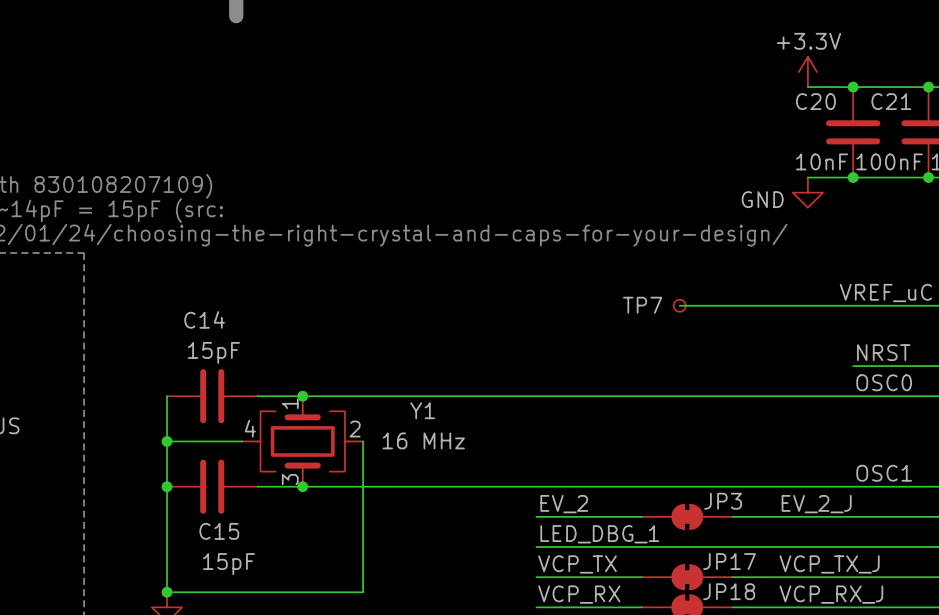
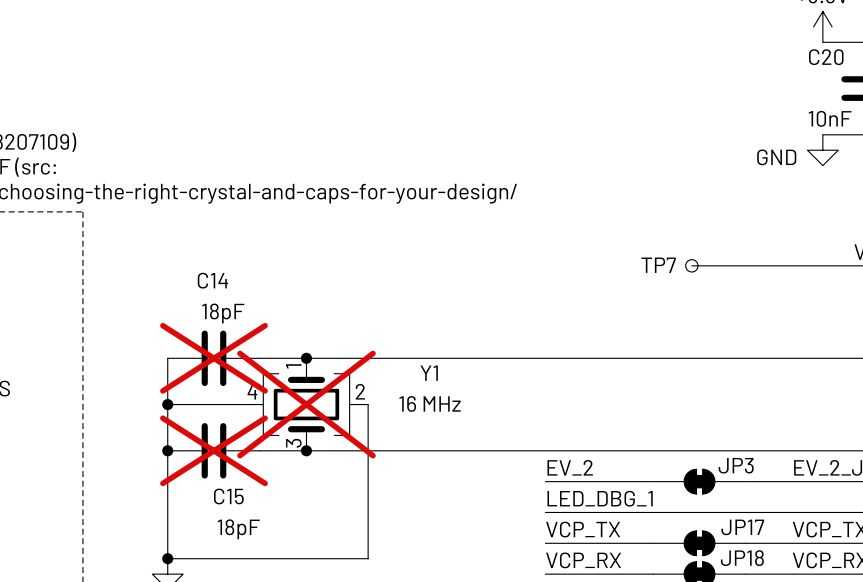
C14 value: 15pF (213, 352) -> 18pF (223, 313)
C14 do-not-place cross: none -> (213, 358)
Y1 do-not-place cross: none -> (306, 404)
C15 do-not-place cross: none -> (213, 450)
C15 value: 15pF (229, 564) -> 18pF (238, 529)

